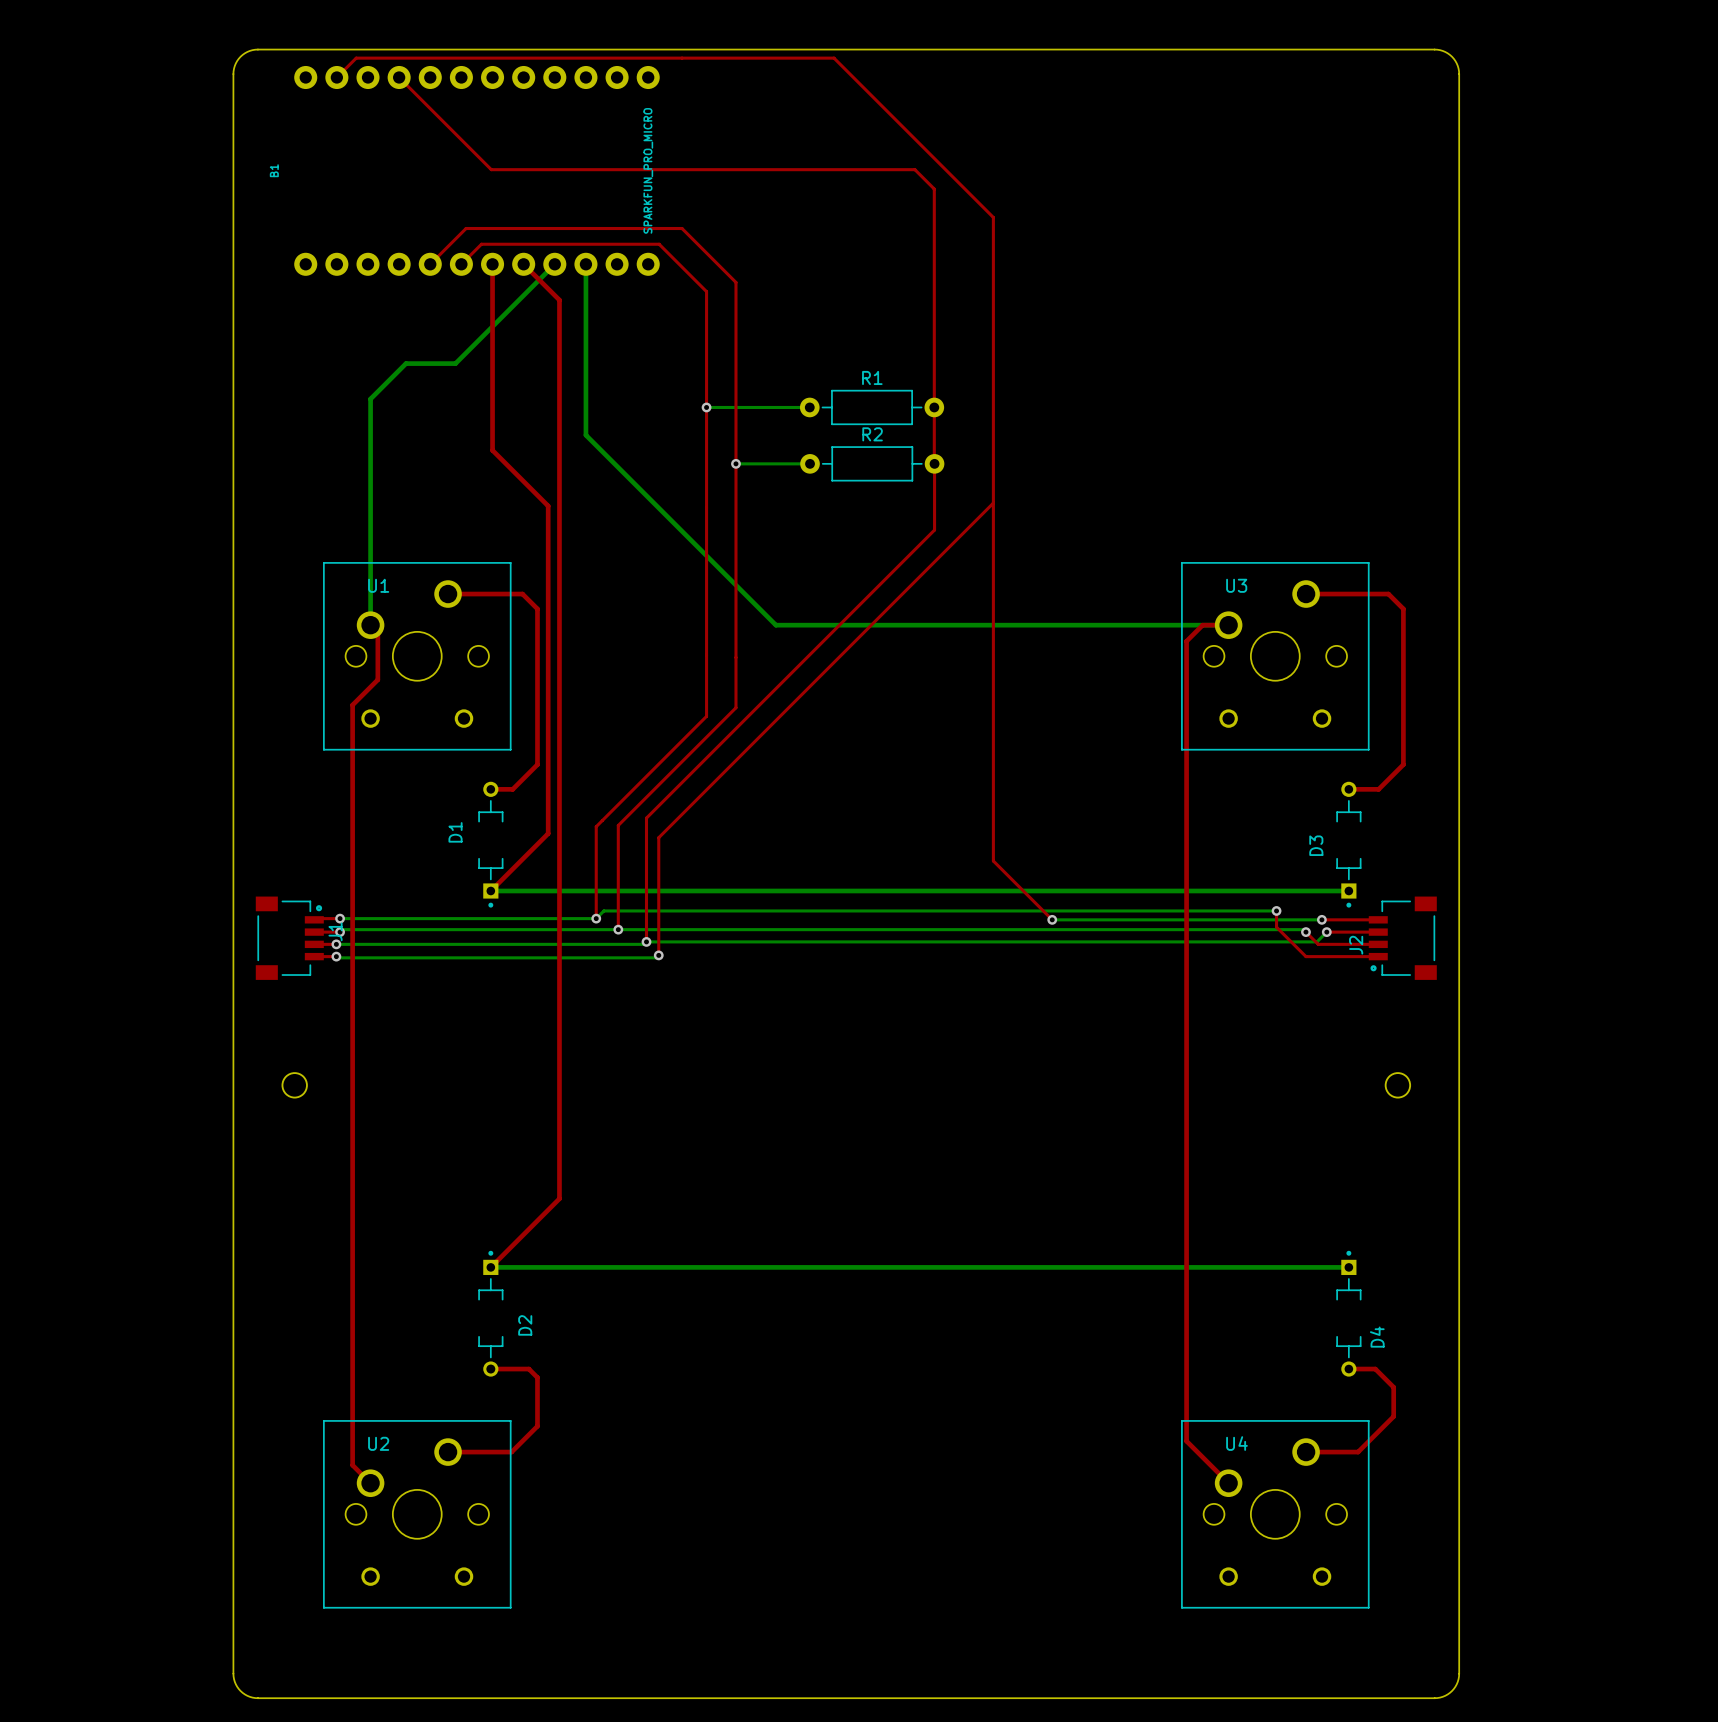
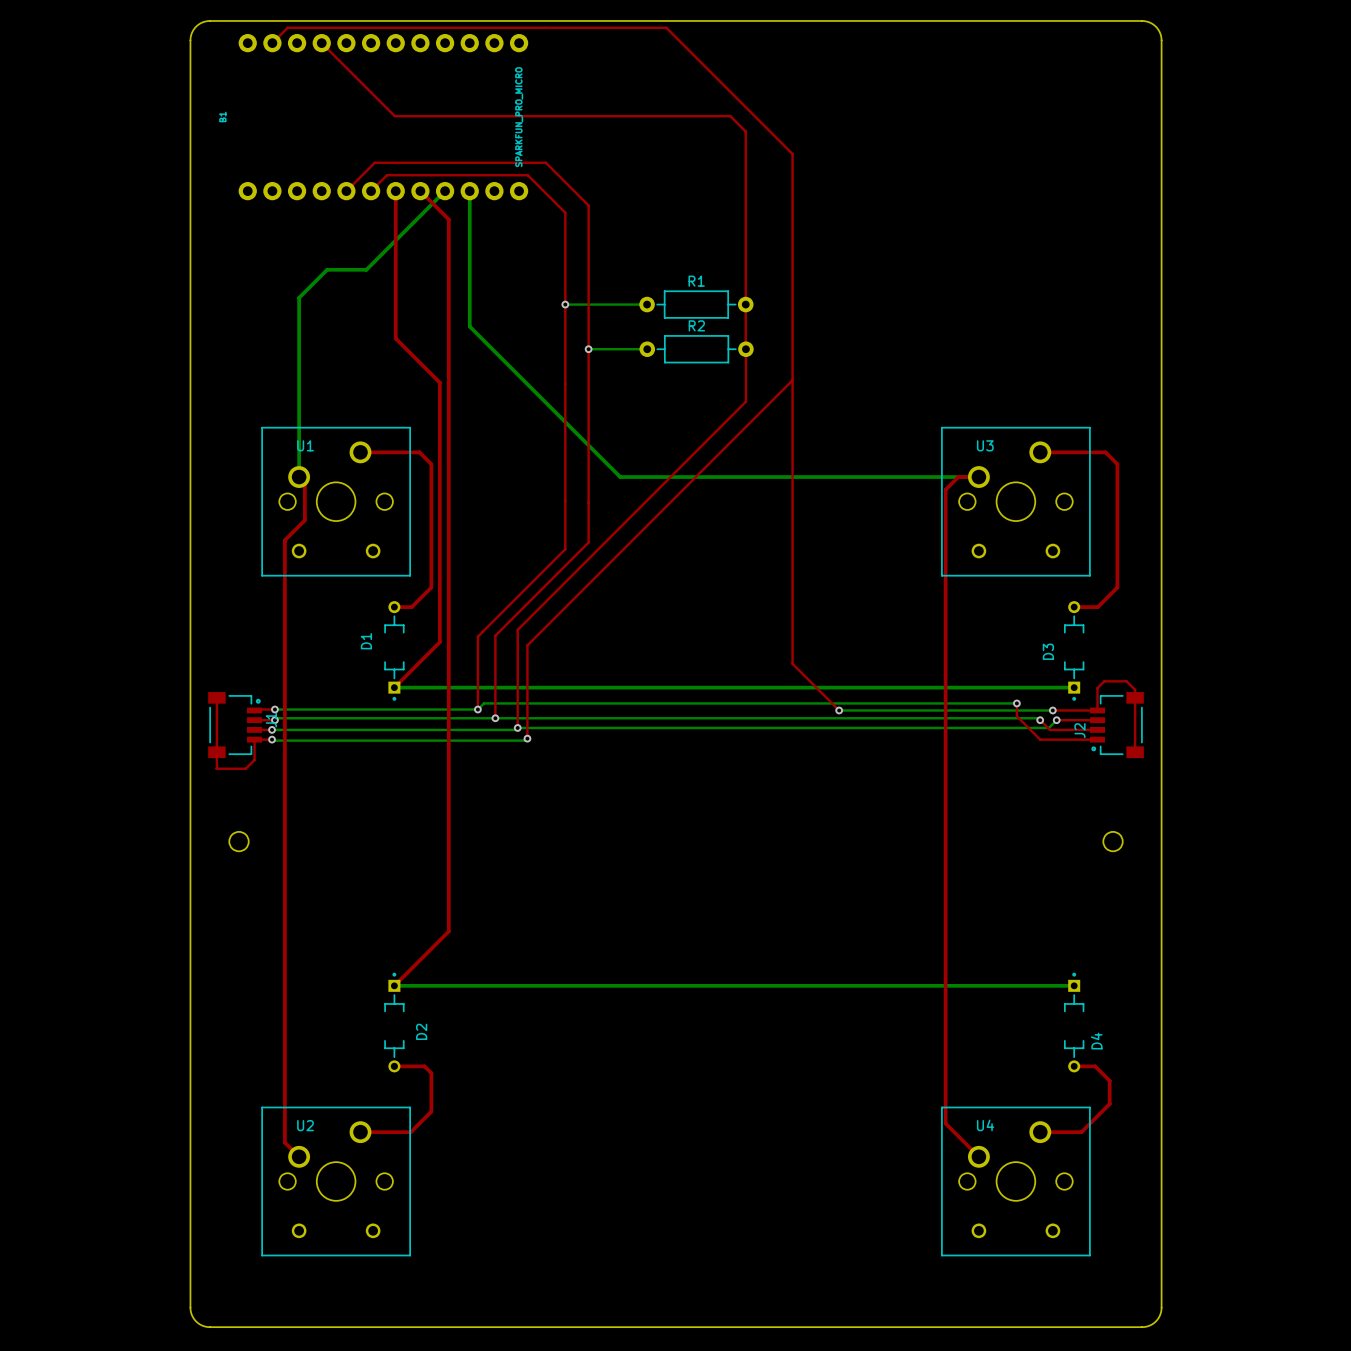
top track: none -> (216, 697) (216, 768) (245, 768) (254, 760) (254, 739)
top track: none -> (1097, 710) (1097, 688) (1104, 681) (1126, 681) (1135, 689) (1135, 752)

